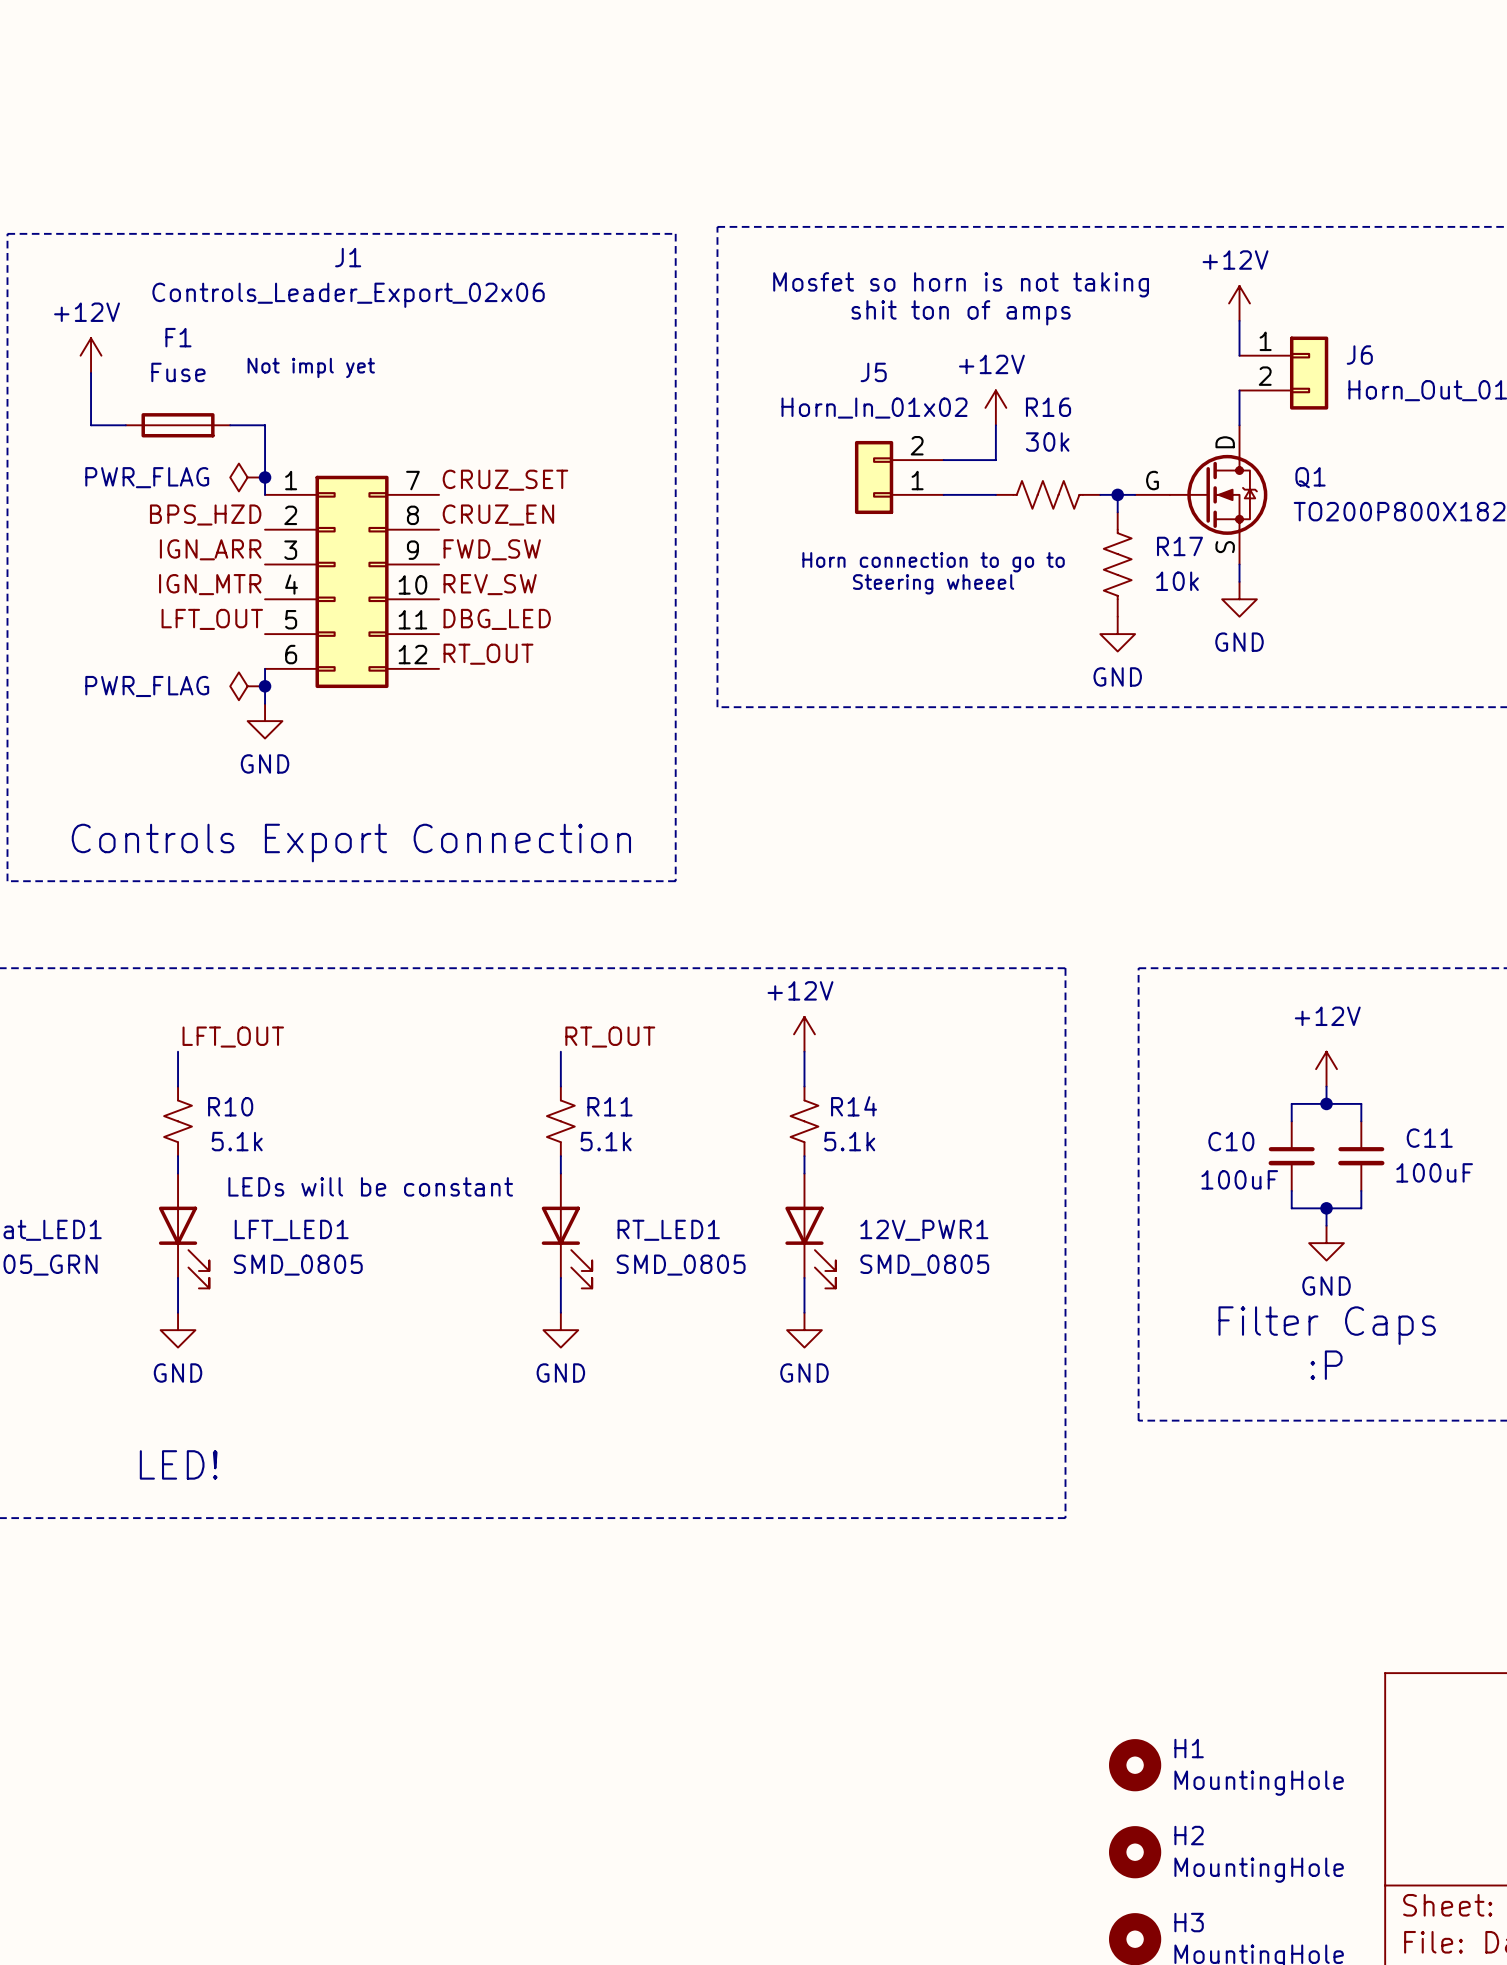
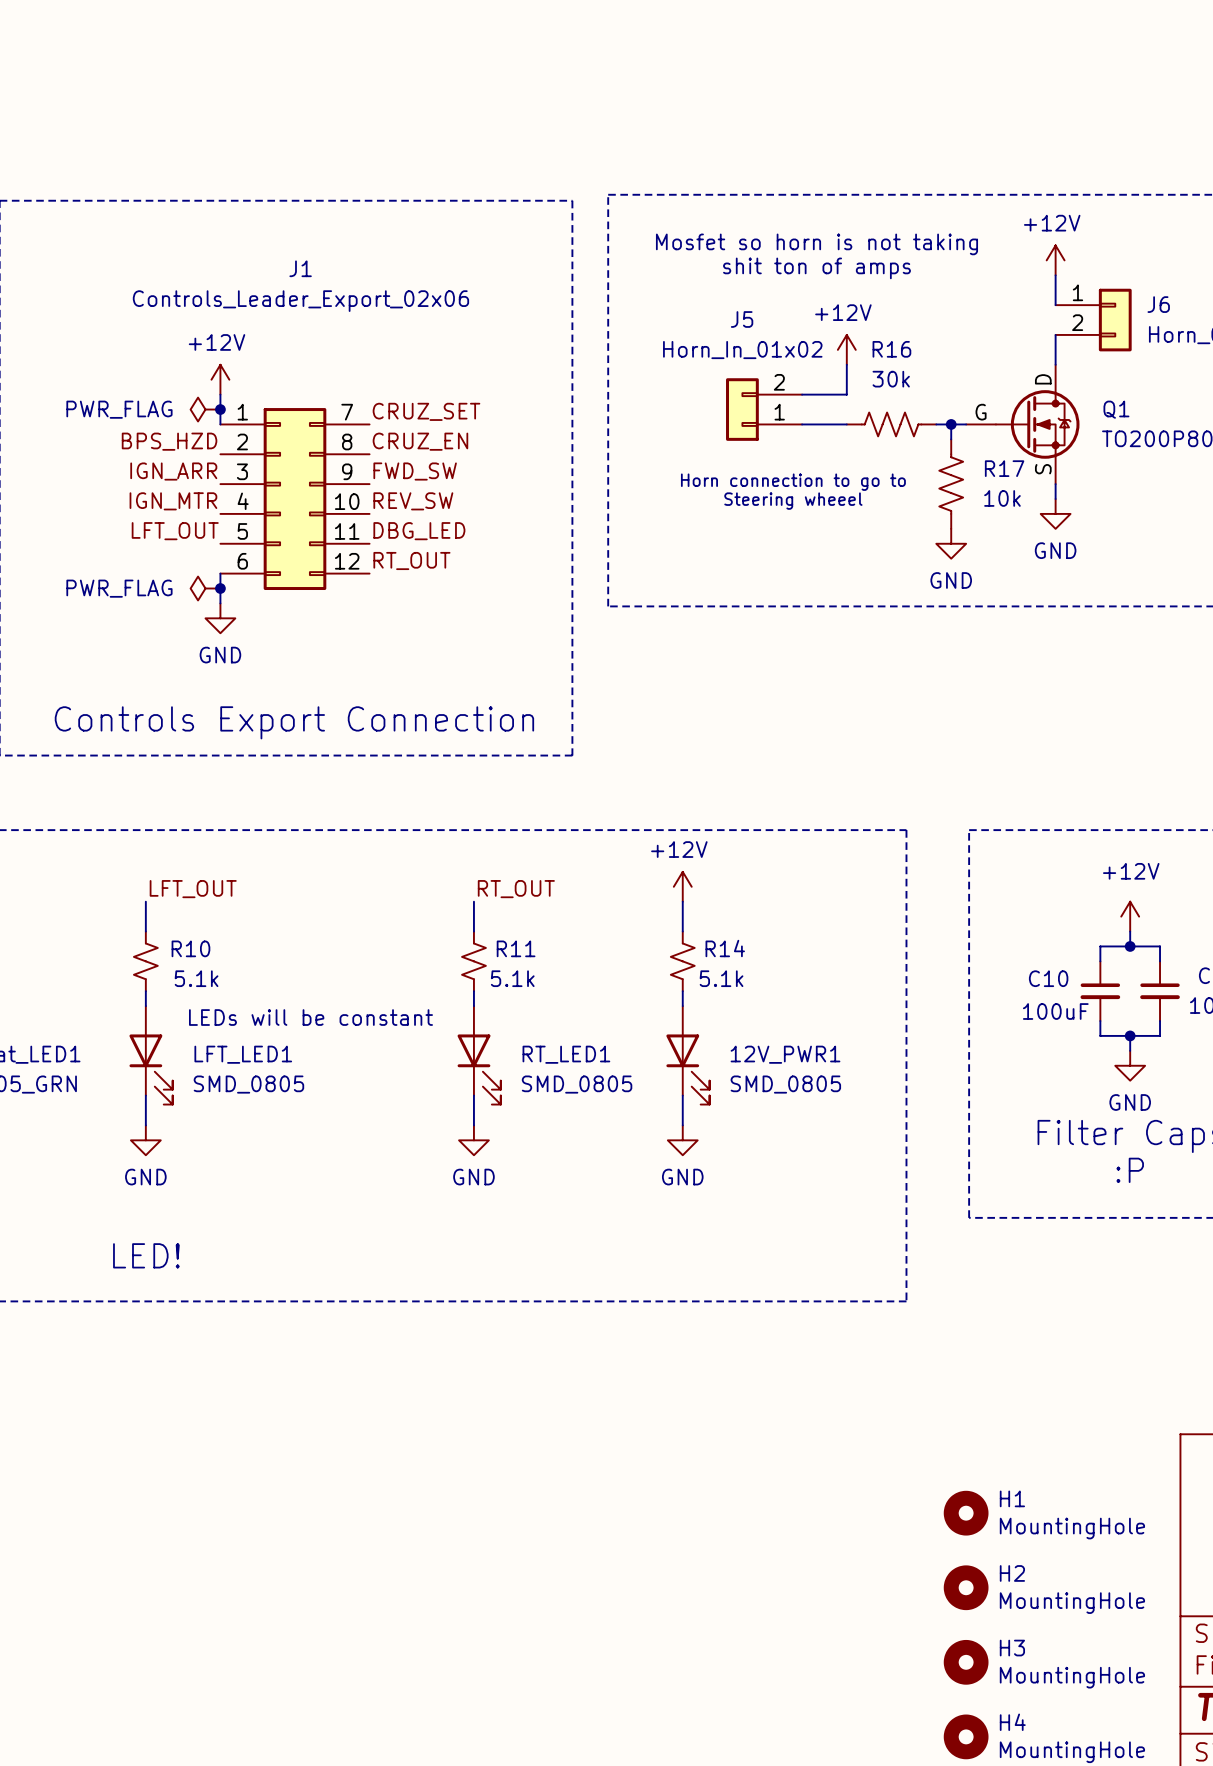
J1 name position: J1 (348, 257) -> J1 (300, 268)
J1 value position: Controls_Leader_Export_02x06 (348, 295) -> Controls_Leader_Export_02x06 (300, 301)
power symbol position: +12V (91, 355) -> +12V (220, 379)
text: Not impl yet (311, 367) -> none
wire: (91, 373) (91, 425) (125, 425) -> none
F1: Fuse (178, 425) -> none
wire: (230, 425) (265, 425) (265, 460) -> none

